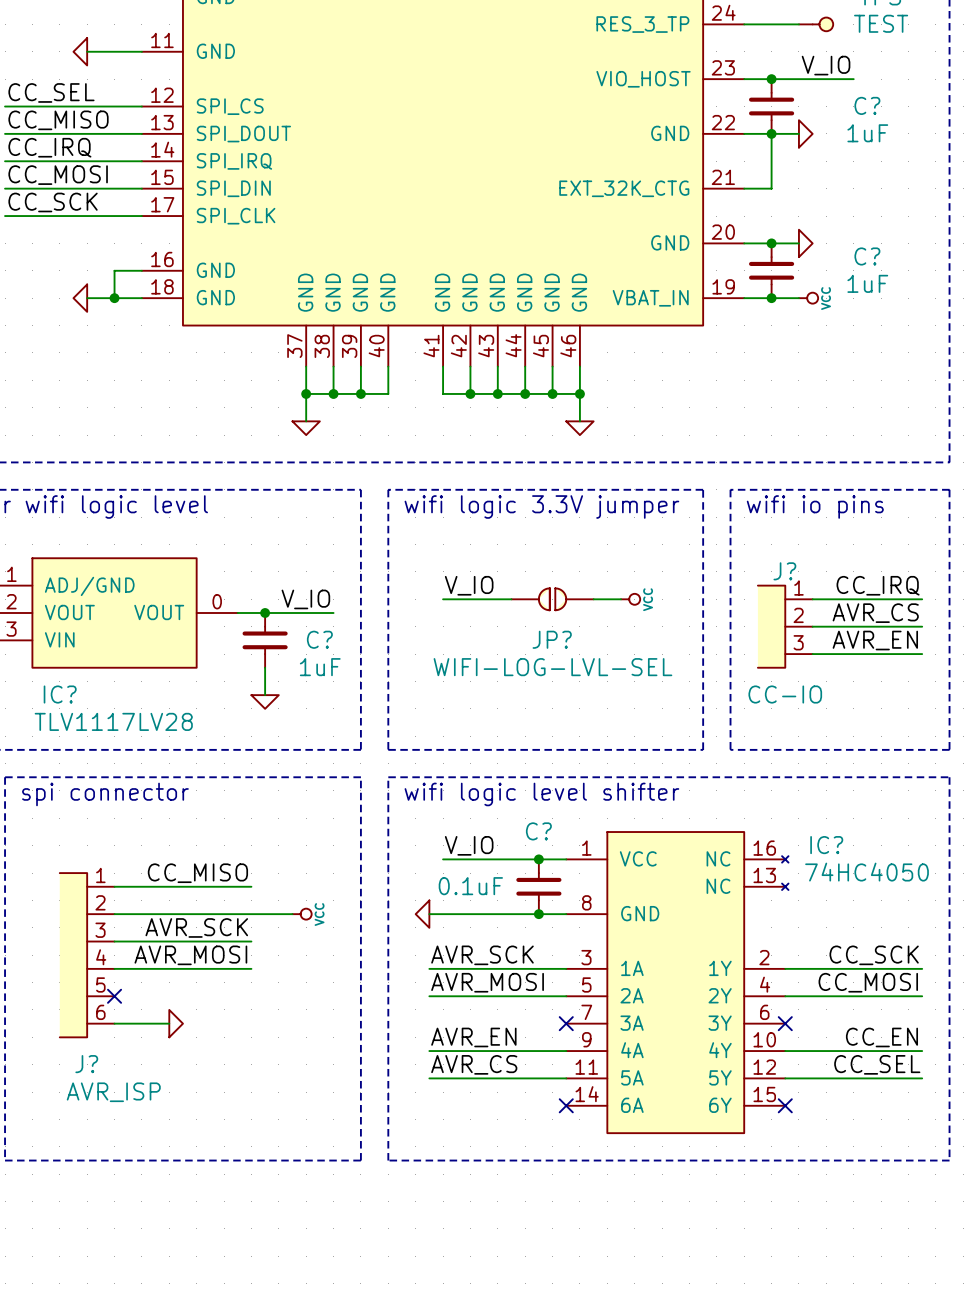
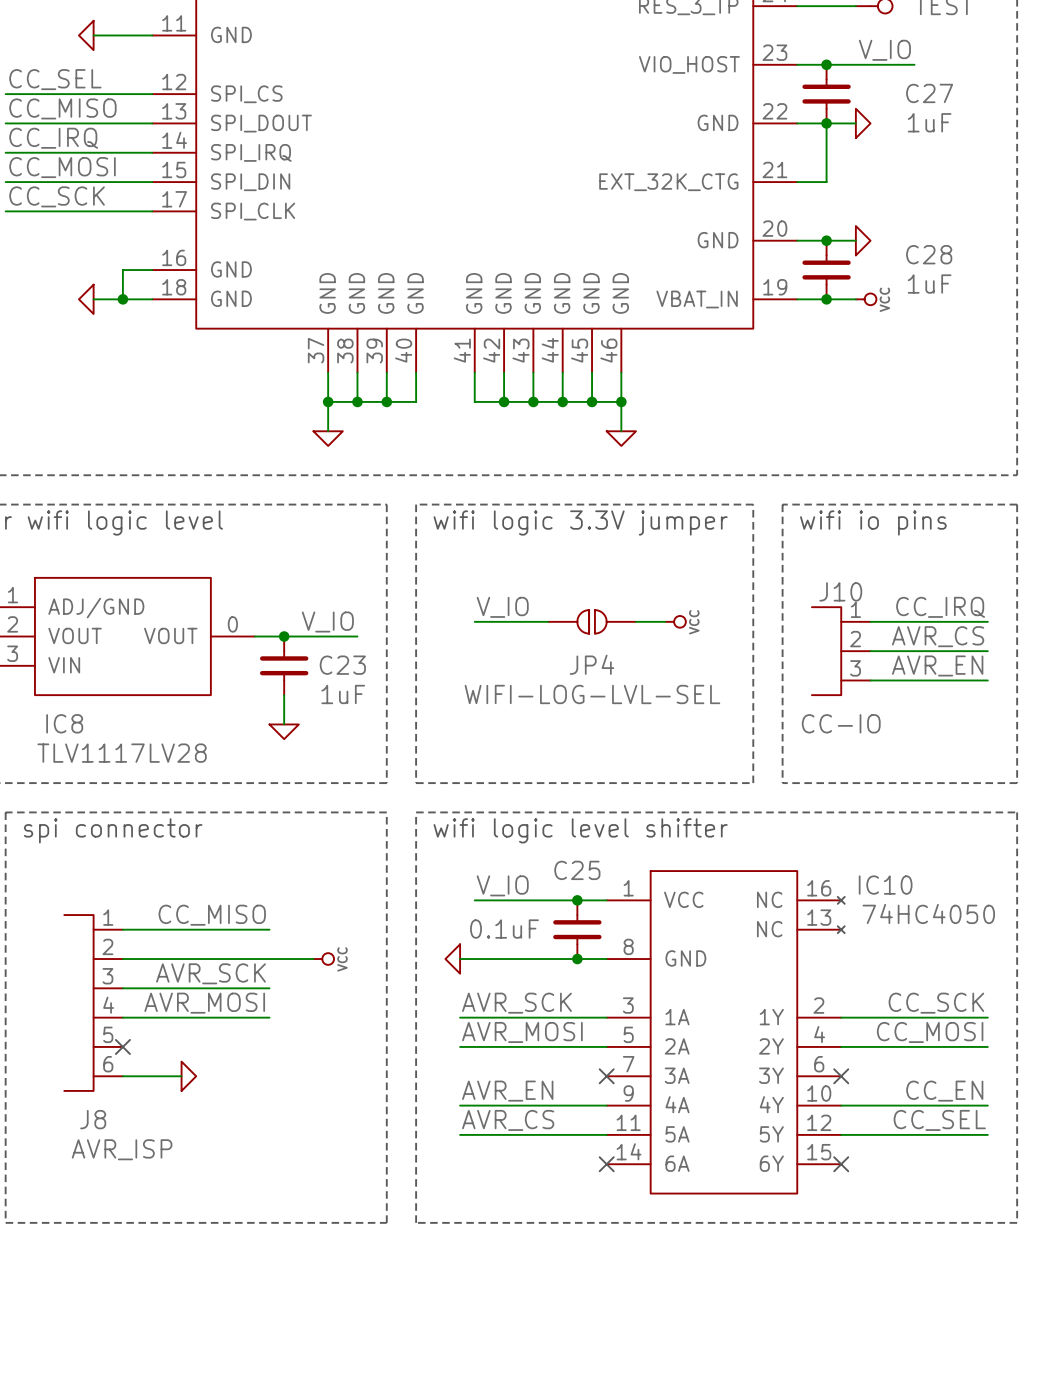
C? name: C? (867, 105) -> C27 (929, 93)
C? name: C? (867, 256) -> C28 (929, 254)
J? name: J? (784, 571) -> J10 (840, 591)
C? name: C? (319, 639) -> C23 (342, 665)
JP? name: JP? (552, 639) -> JP4 (592, 664)
IC? name: IC? (60, 694) -> IC8 (64, 723)
C? name: C? (538, 831) -> C25 (577, 870)
IC? name: IC? (826, 845) -> IC10 (885, 885)
J? name: J? (86, 1064) -> J8 (93, 1119)

